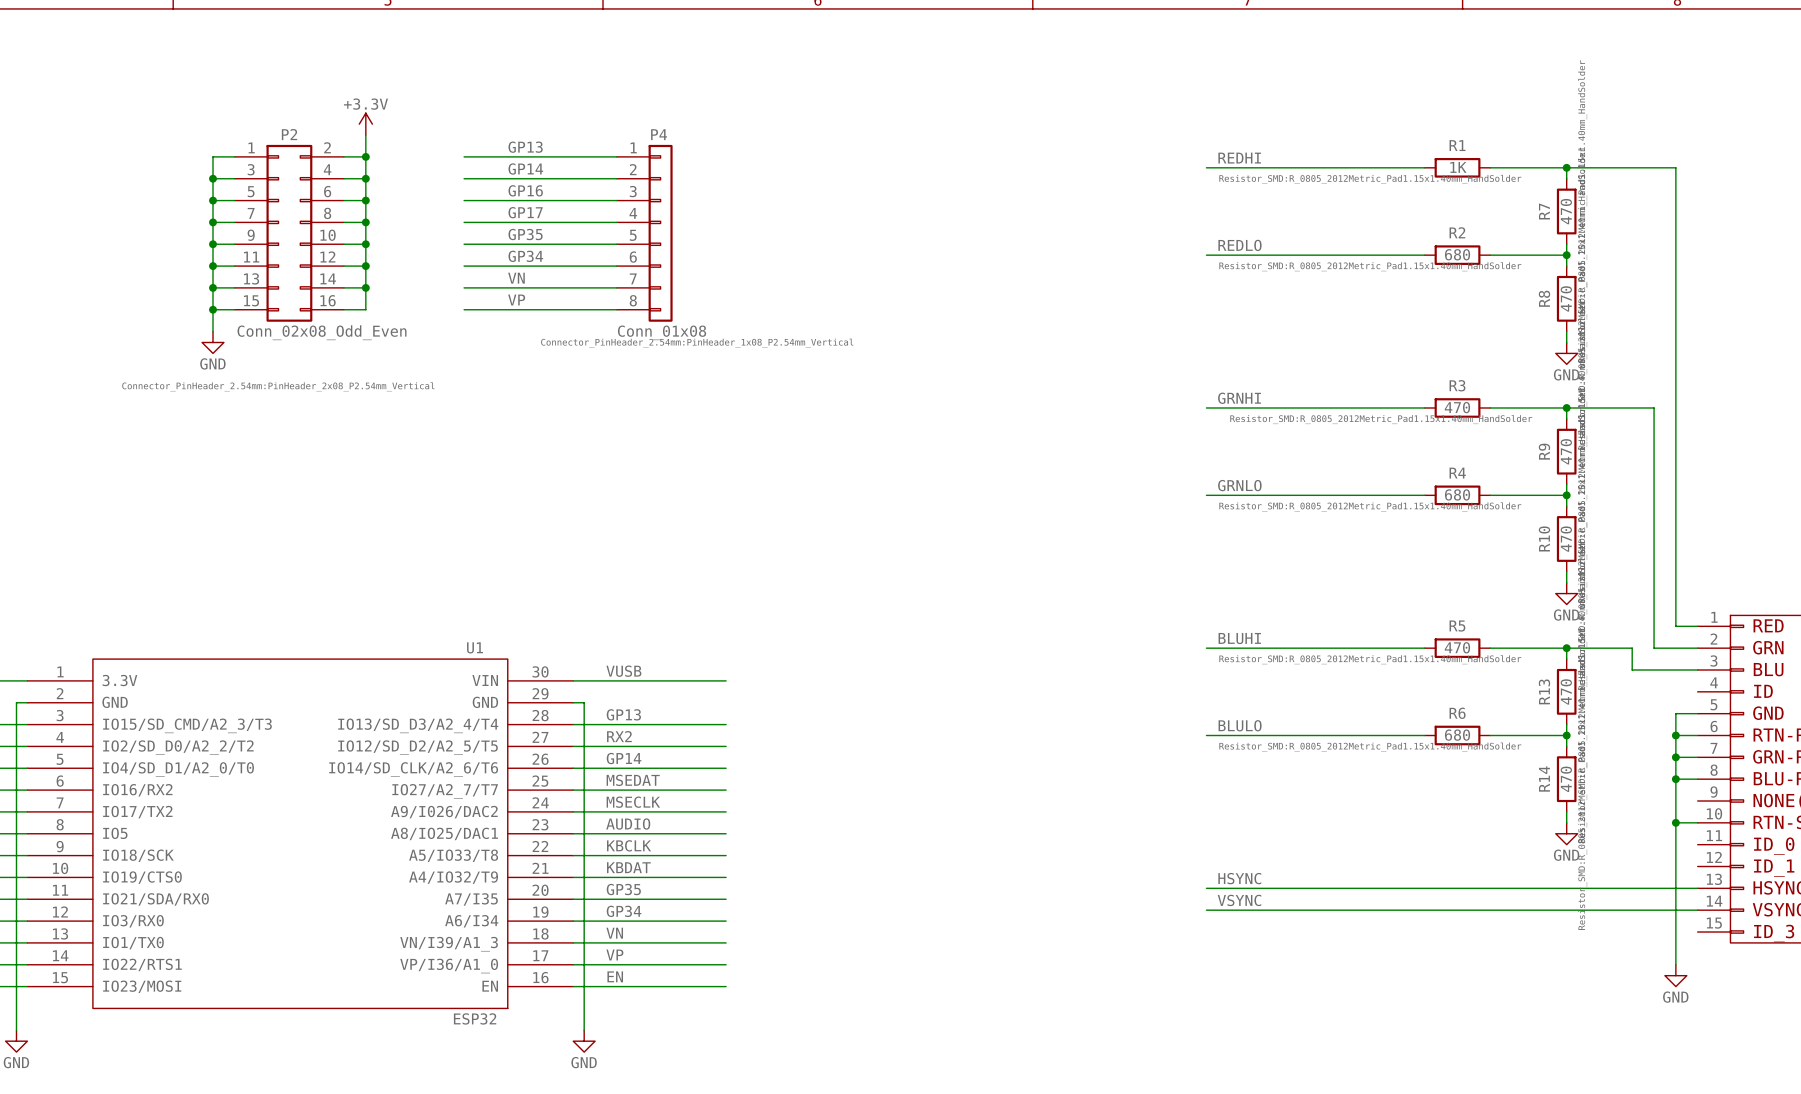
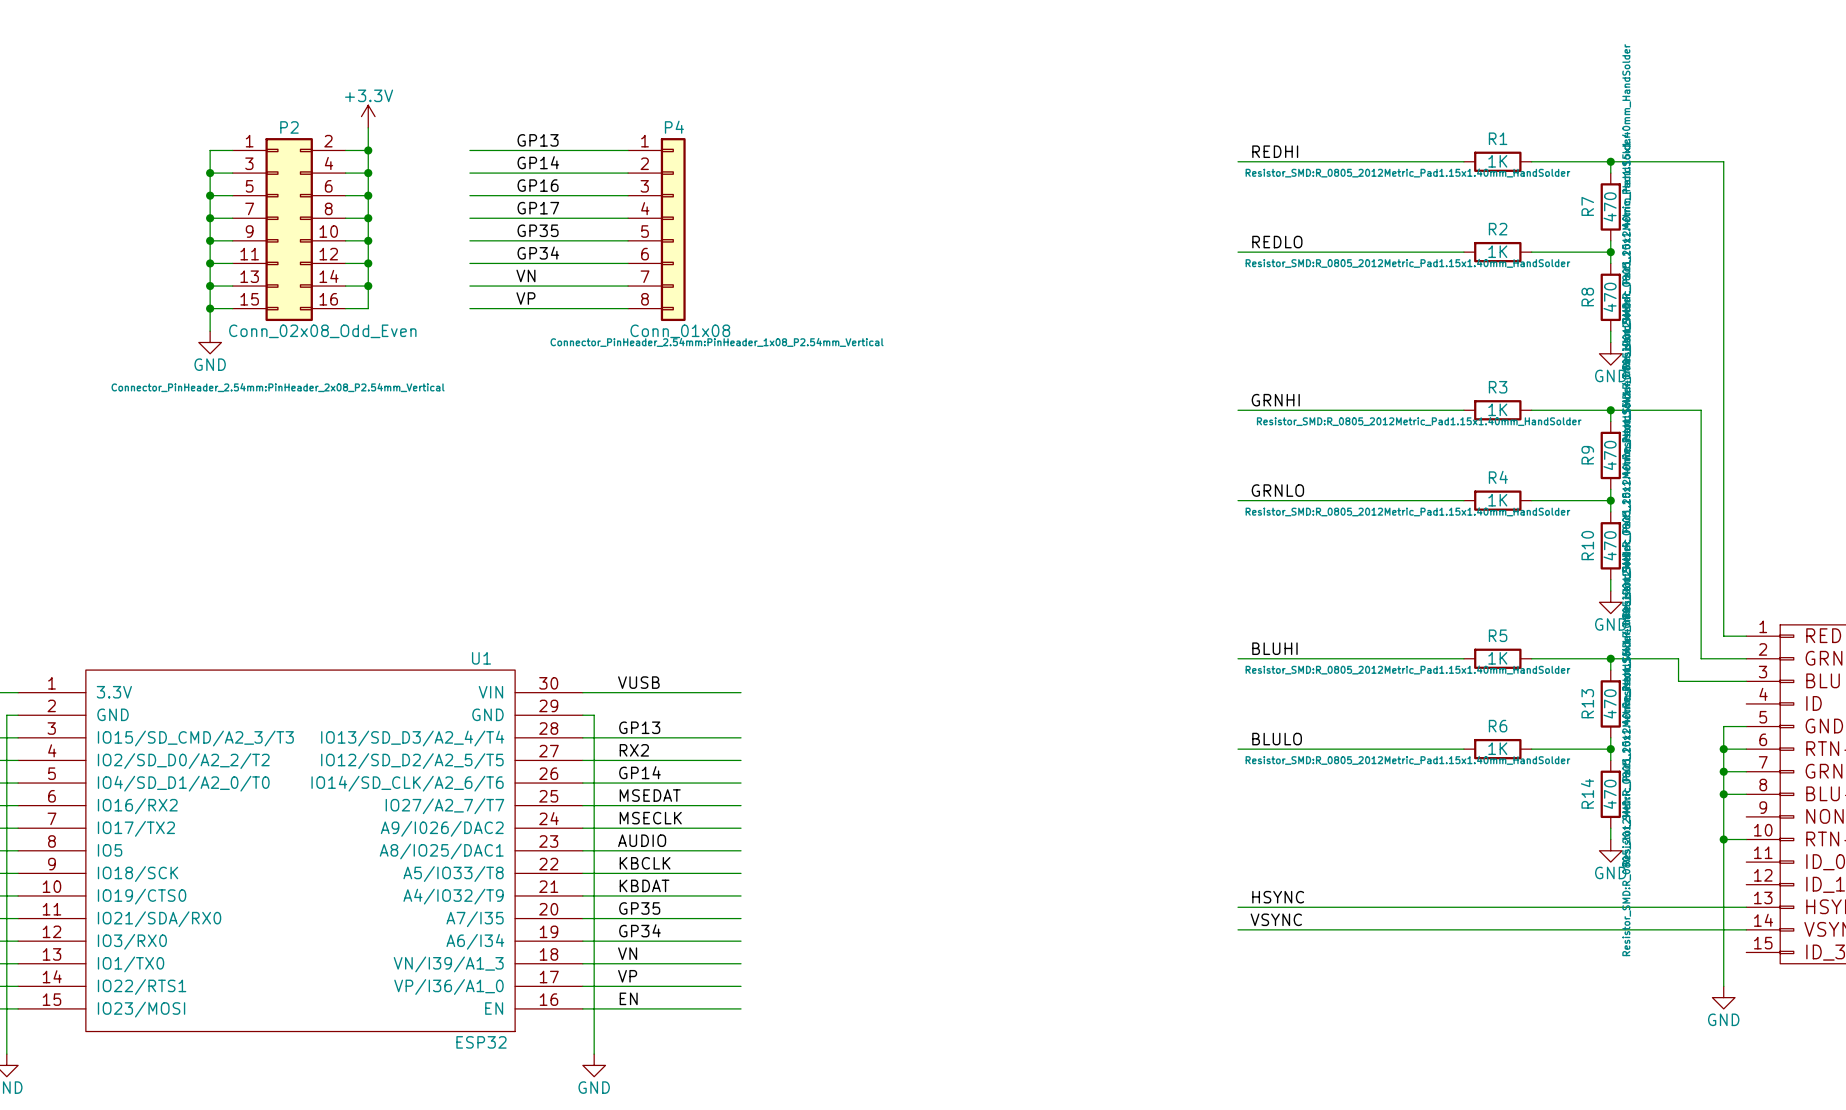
R2 value: 680 (1457, 254) -> 1K (1497, 251)
R3 value: 470 (1457, 407) -> 1K (1497, 409)
R4 value: 680 (1457, 494) -> 1K (1497, 500)
R5 value: 470 (1457, 647) -> 1K (1497, 658)
R6 value: 680 (1457, 735) -> 1K (1497, 748)

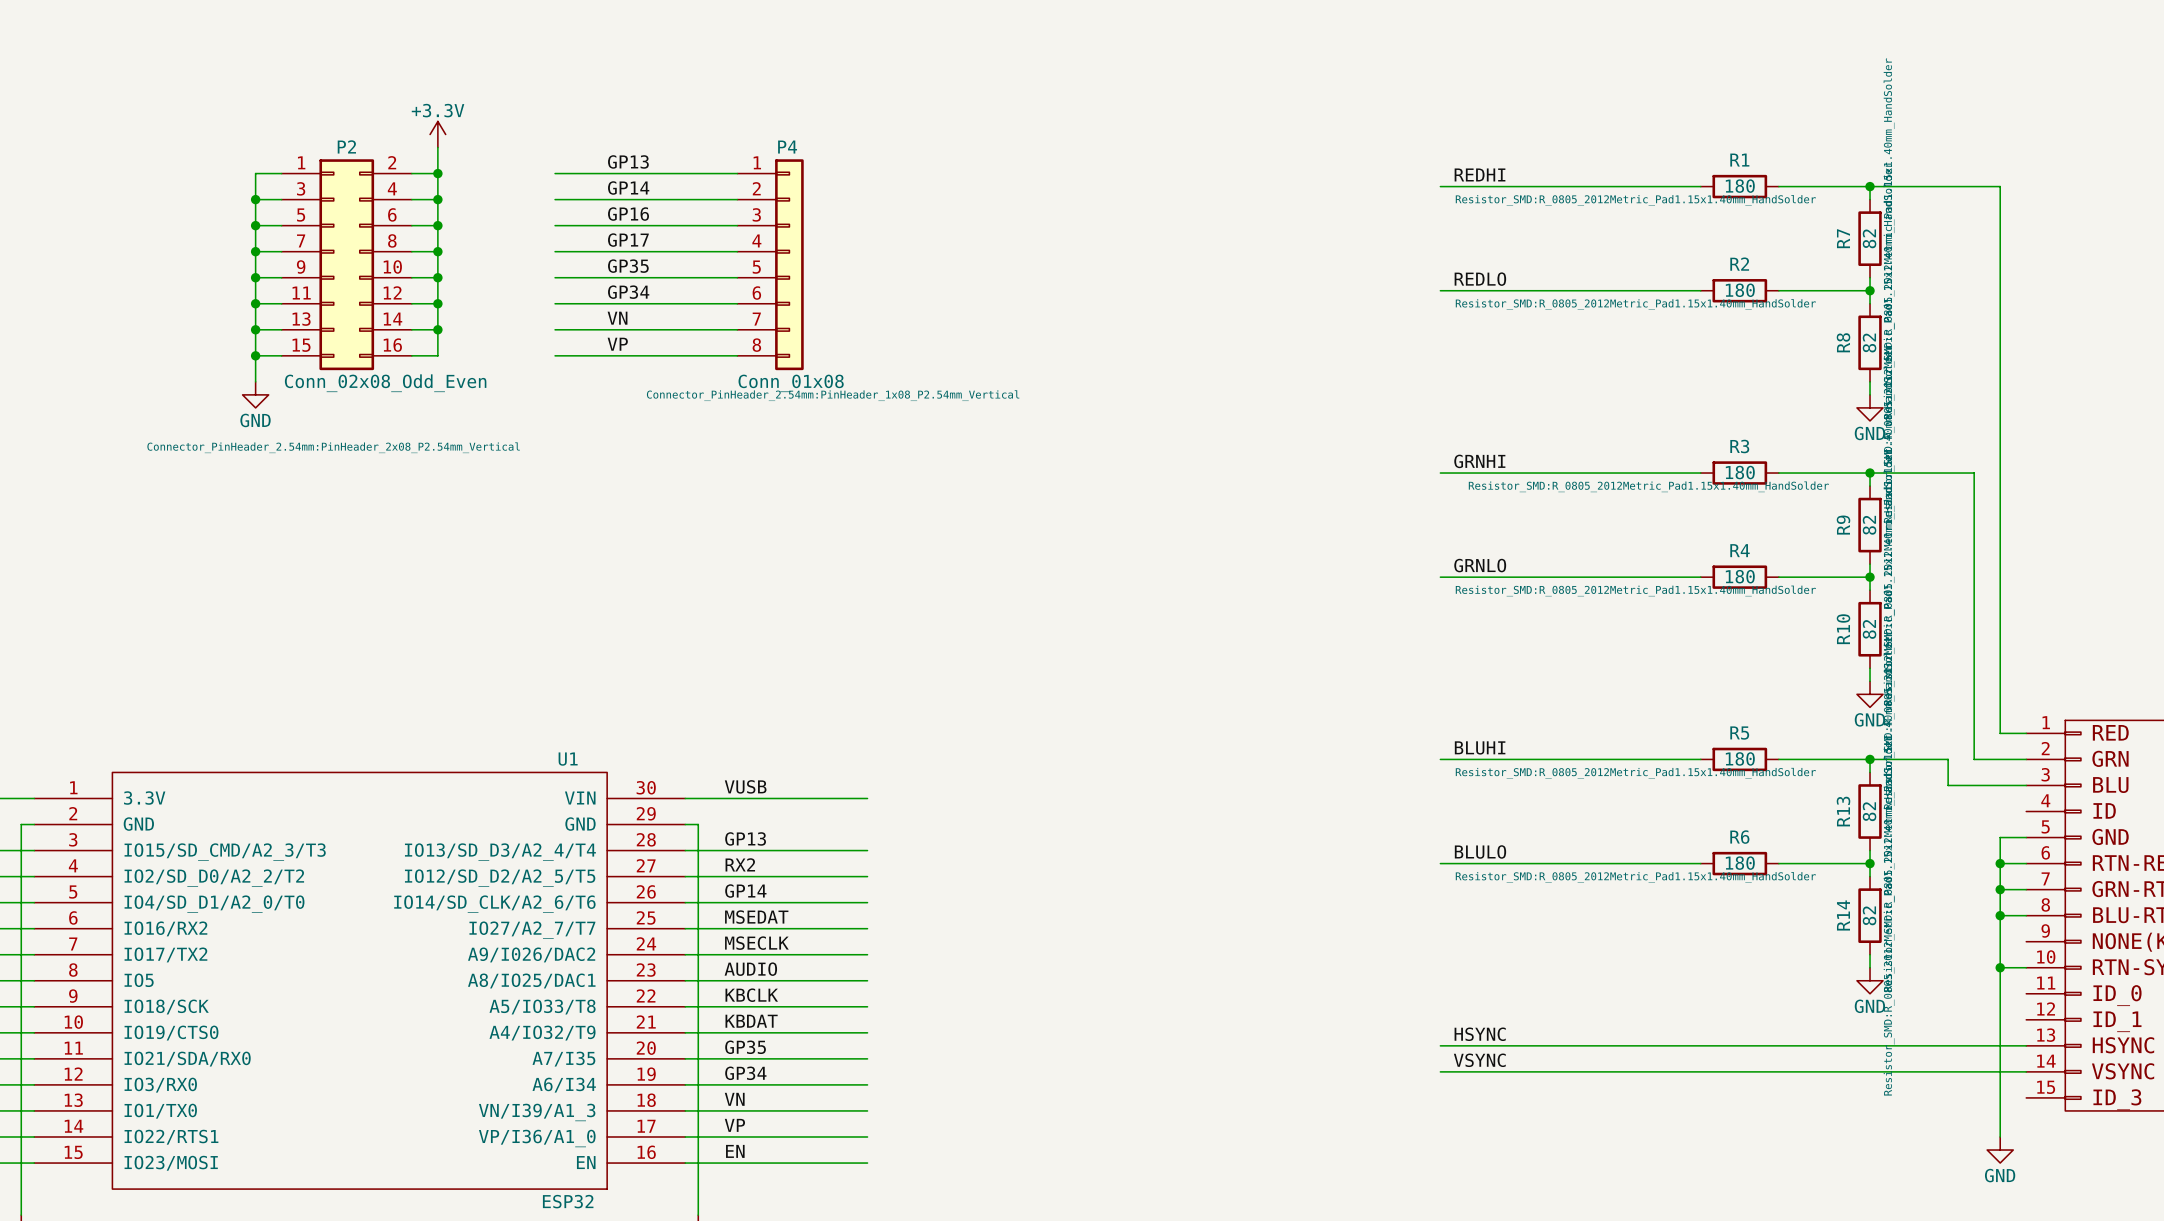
R1 value: 1K (1497, 161) -> 180 (1740, 186)
R7 value: 470 (1610, 206) -> 82 (1869, 238)
R2 value: 1K (1497, 251) -> 180 (1740, 290)
R8 value: 470 (1610, 297) -> 82 (1869, 343)
R3 value: 1K (1497, 409) -> 180 (1740, 472)
R9 value: 470 (1610, 455) -> 82 (1869, 525)
R4 value: 1K (1497, 500) -> 180 (1740, 576)
R10 value: 470 (1610, 545) -> 82 (1869, 629)
R5 value: 1K (1497, 658) -> 180 (1740, 758)
R13 value: 470 (1610, 703) -> 82 (1869, 811)
R6 value: 1K (1497, 748) -> 180 (1740, 863)
R14 value: 470 (1610, 794) -> 82 (1869, 915)

